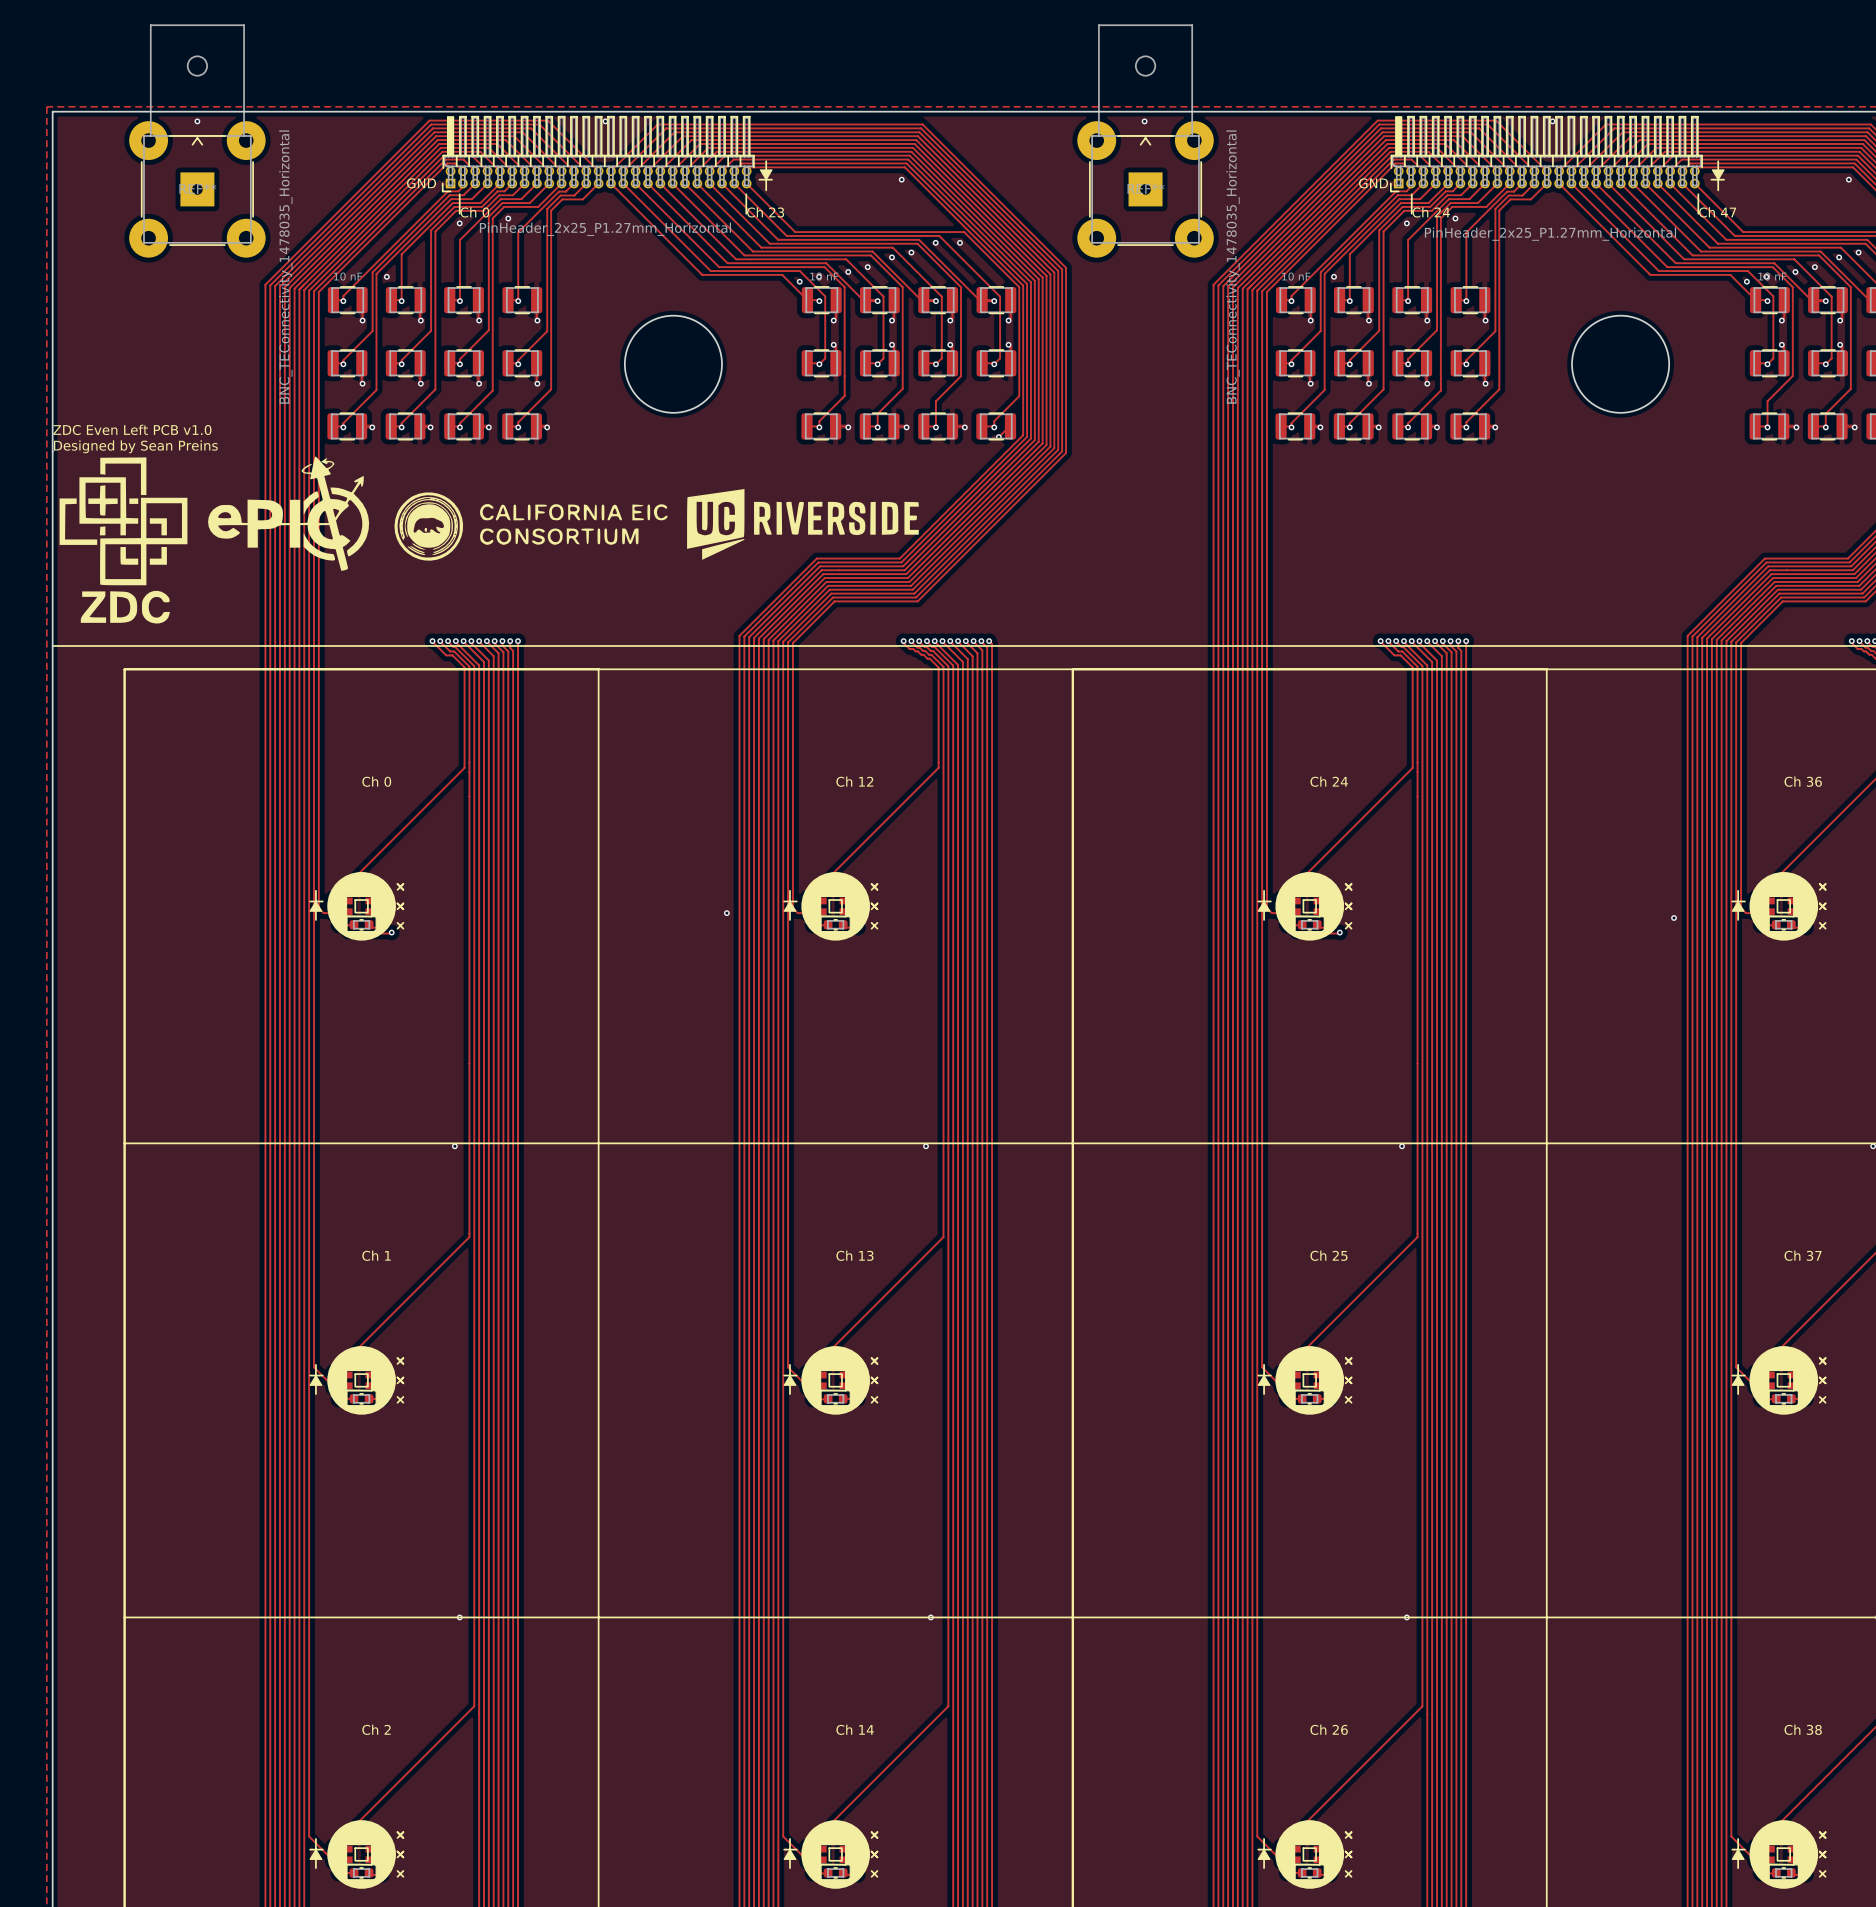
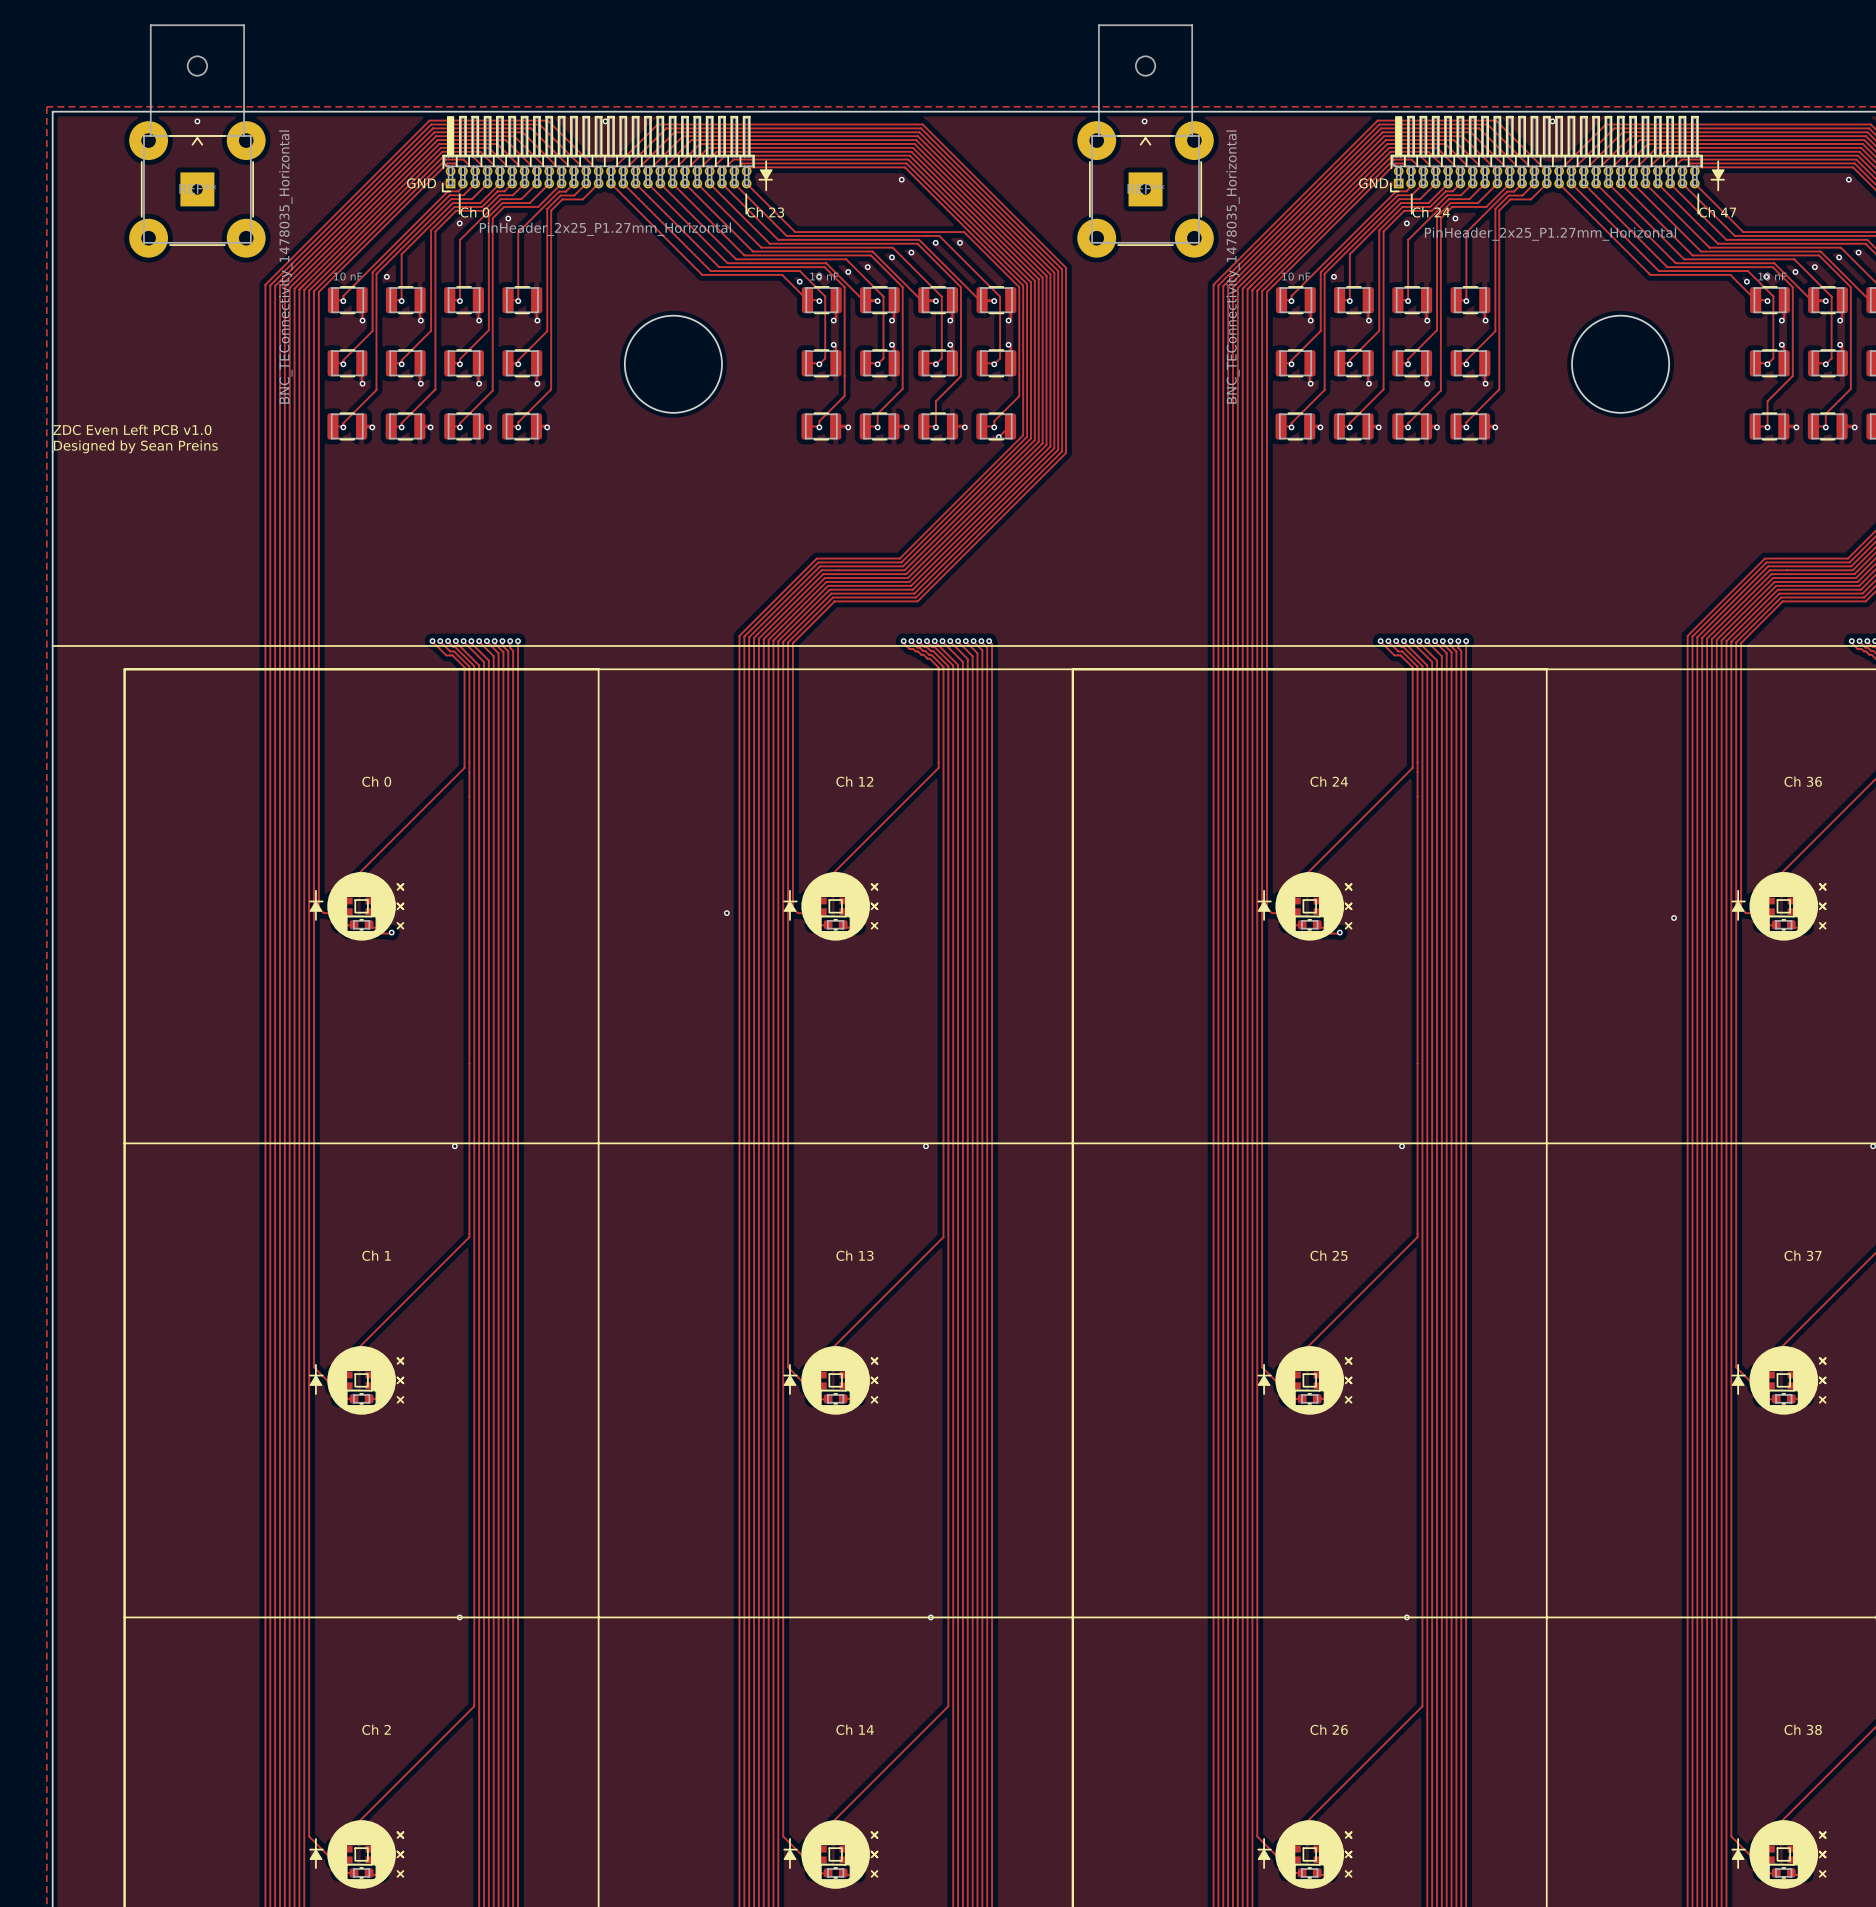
drawing: [59, 456, 919, 624] -> none

